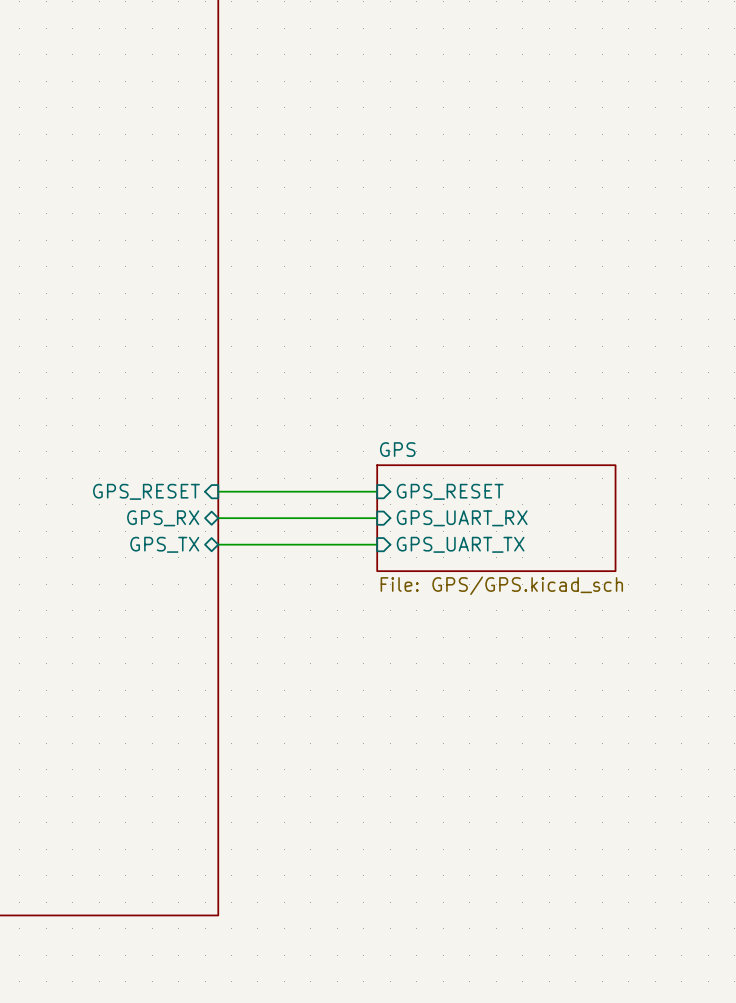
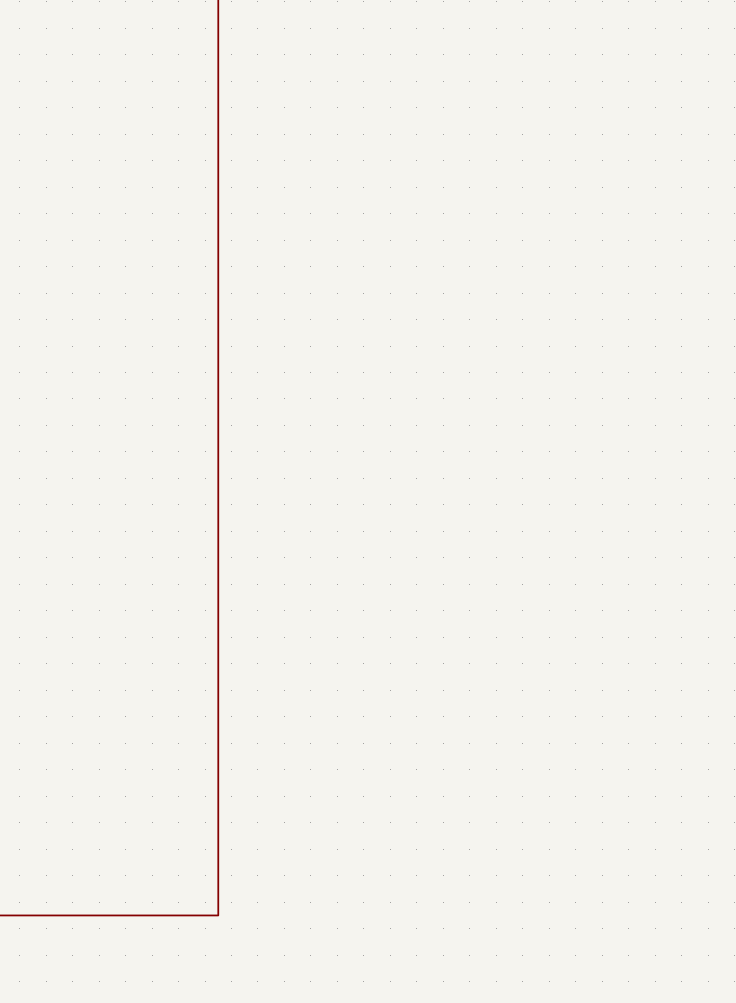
sheet pin: GPS_RESET (146, 491) -> none
wire: (218, 491) (377, 491) -> none
sheet pin: GPS_RESET (450, 491) -> none
sheet pin: GPS_RX (163, 518) -> none
wire: (218, 518) (377, 518) -> none
sheet pin: GPS_UART_RX (462, 518) -> none
sheet GPS: File: GPS/GPS.kicad_sch (496, 518) -> none
sheet pin: GPS_TX (164, 544) -> none
wire: (218, 544) (377, 544) -> none
sheet pin: GPS_UART_TX (460, 544) -> none

